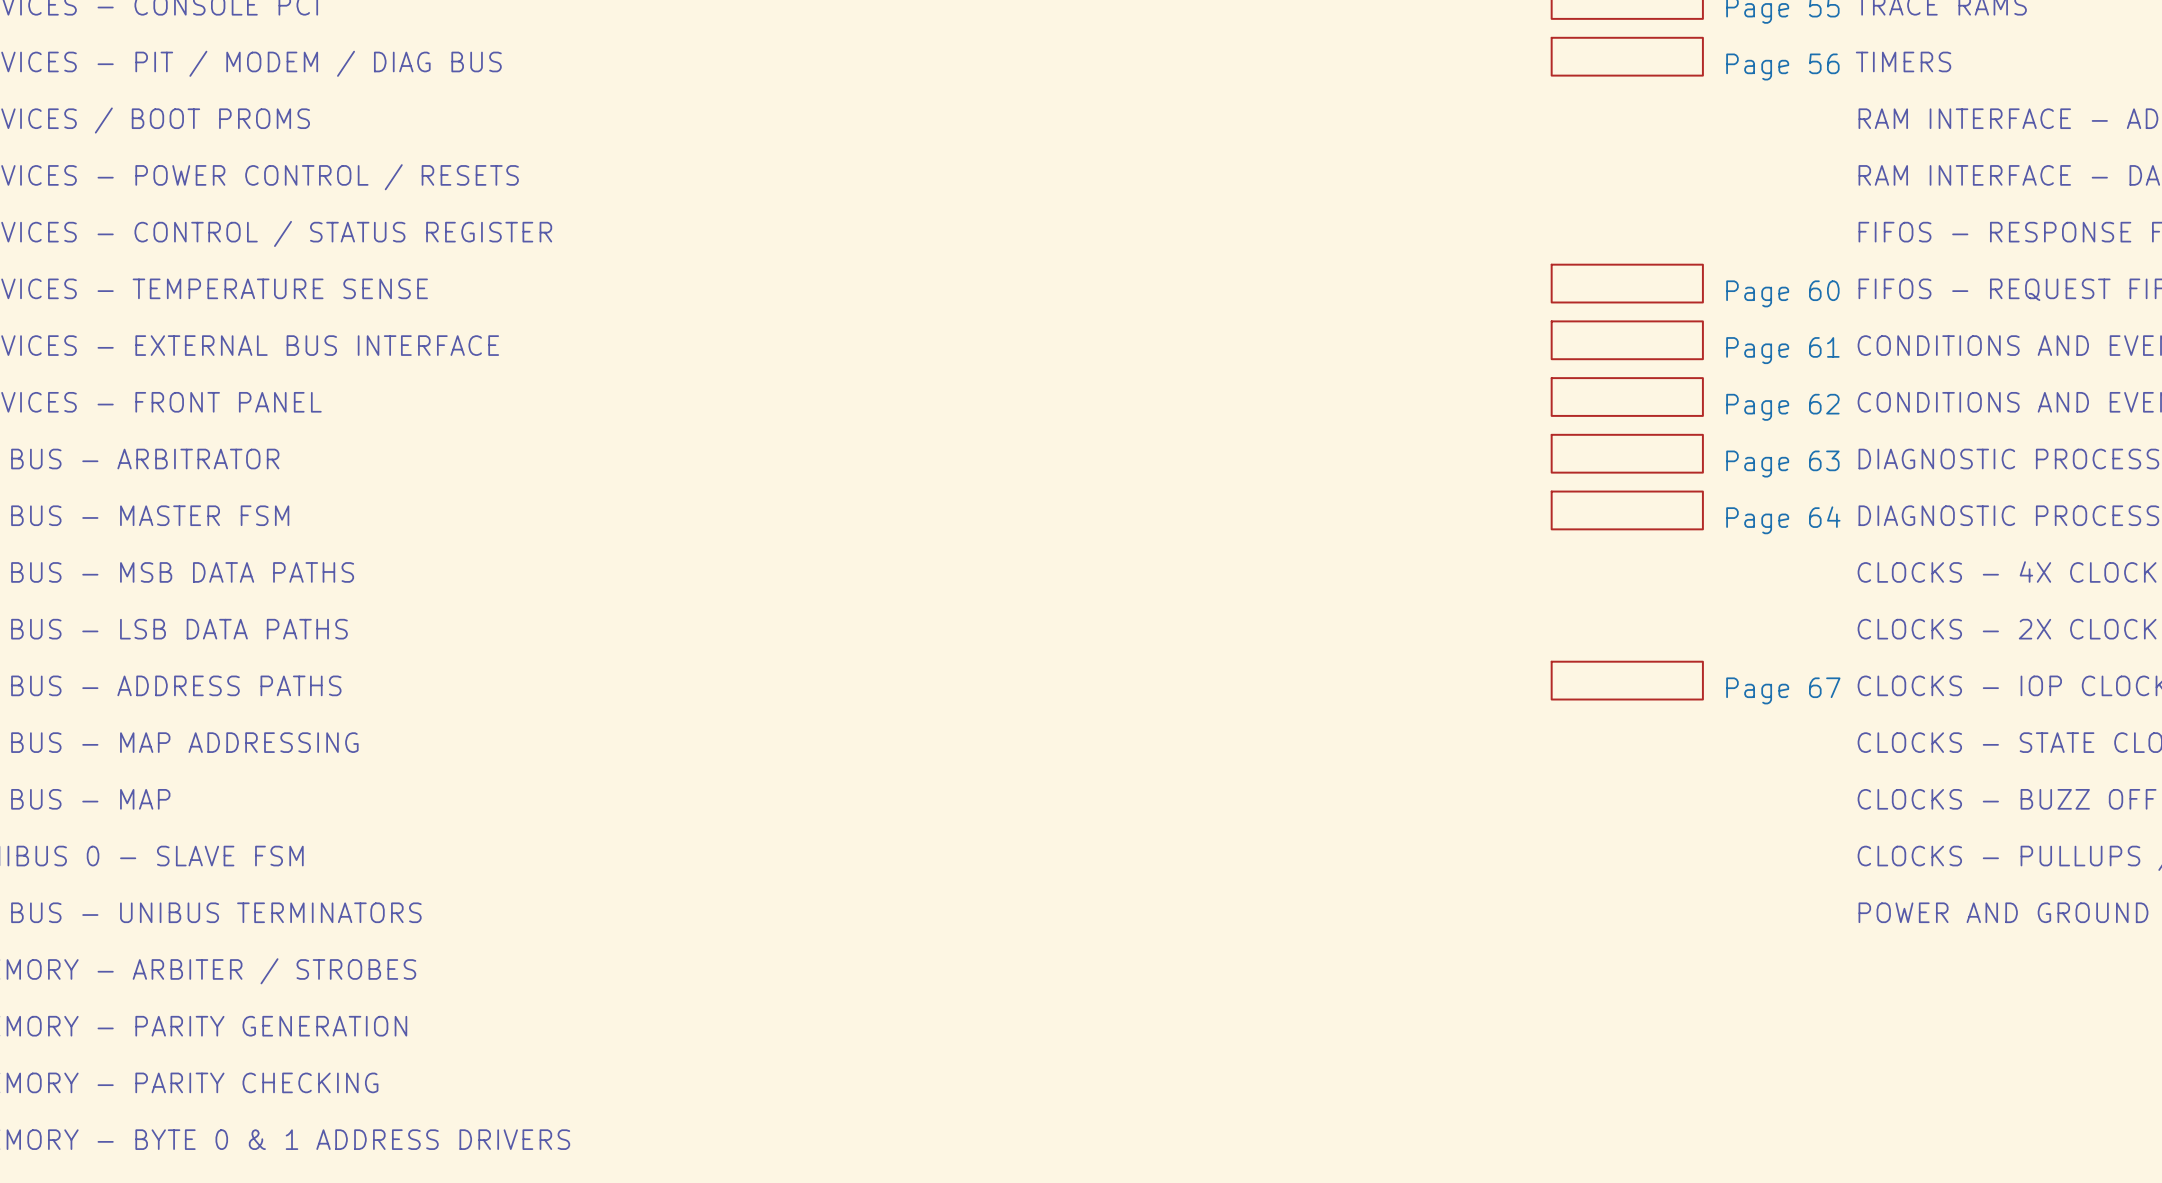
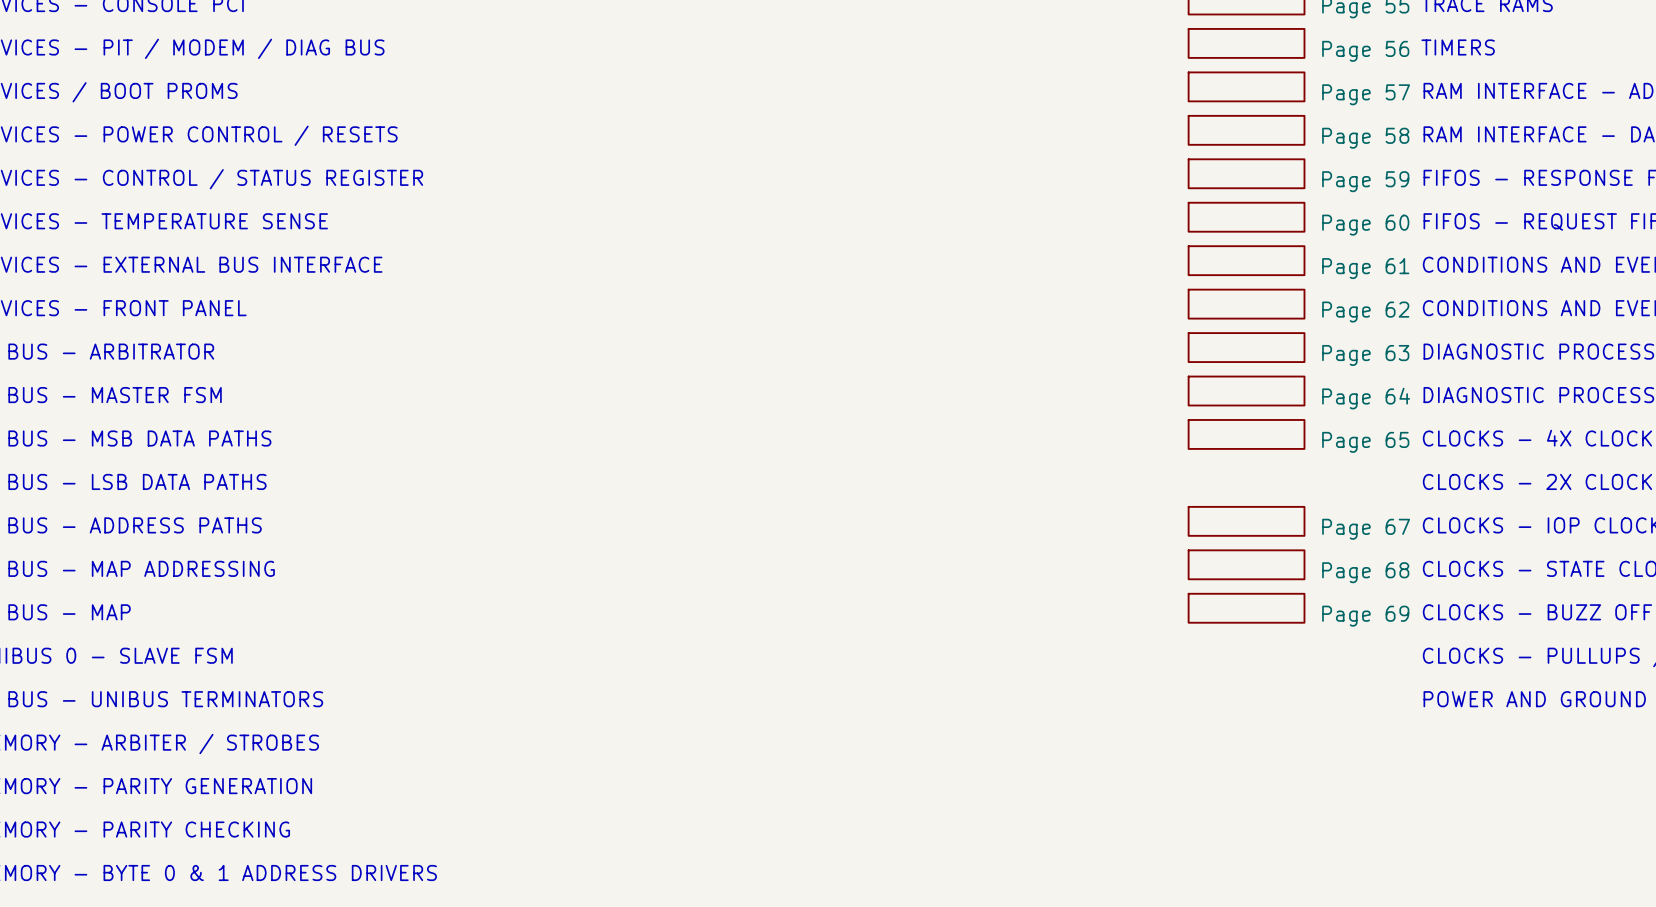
sheet Page 57: none -> (1246, 86)
sheet Page 58: none -> (1246, 130)
sheet Page 59: none -> (1246, 173)
sheet Page 65: none -> (1246, 434)
sheet Page 68: none -> (1246, 564)
sheet Page 69: none -> (1246, 608)

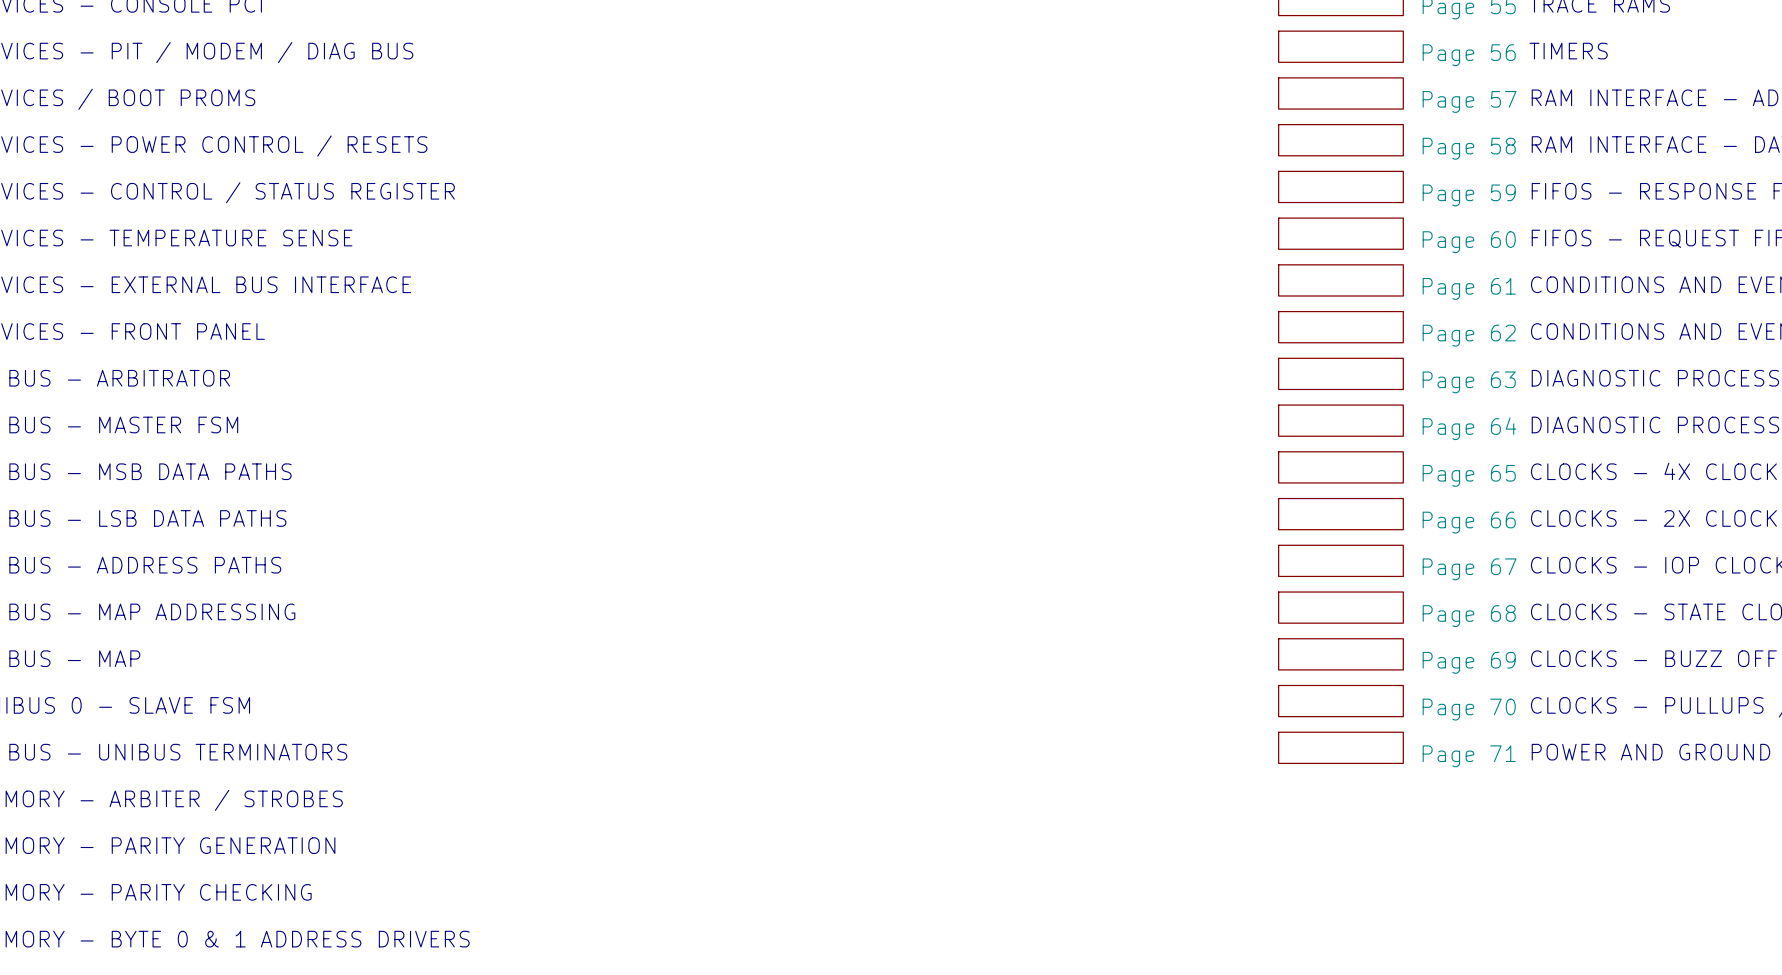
sheet Page 66: none -> (1340, 514)
sheet Page 70: none -> (1340, 701)
sheet Page 71: none -> (1340, 747)

